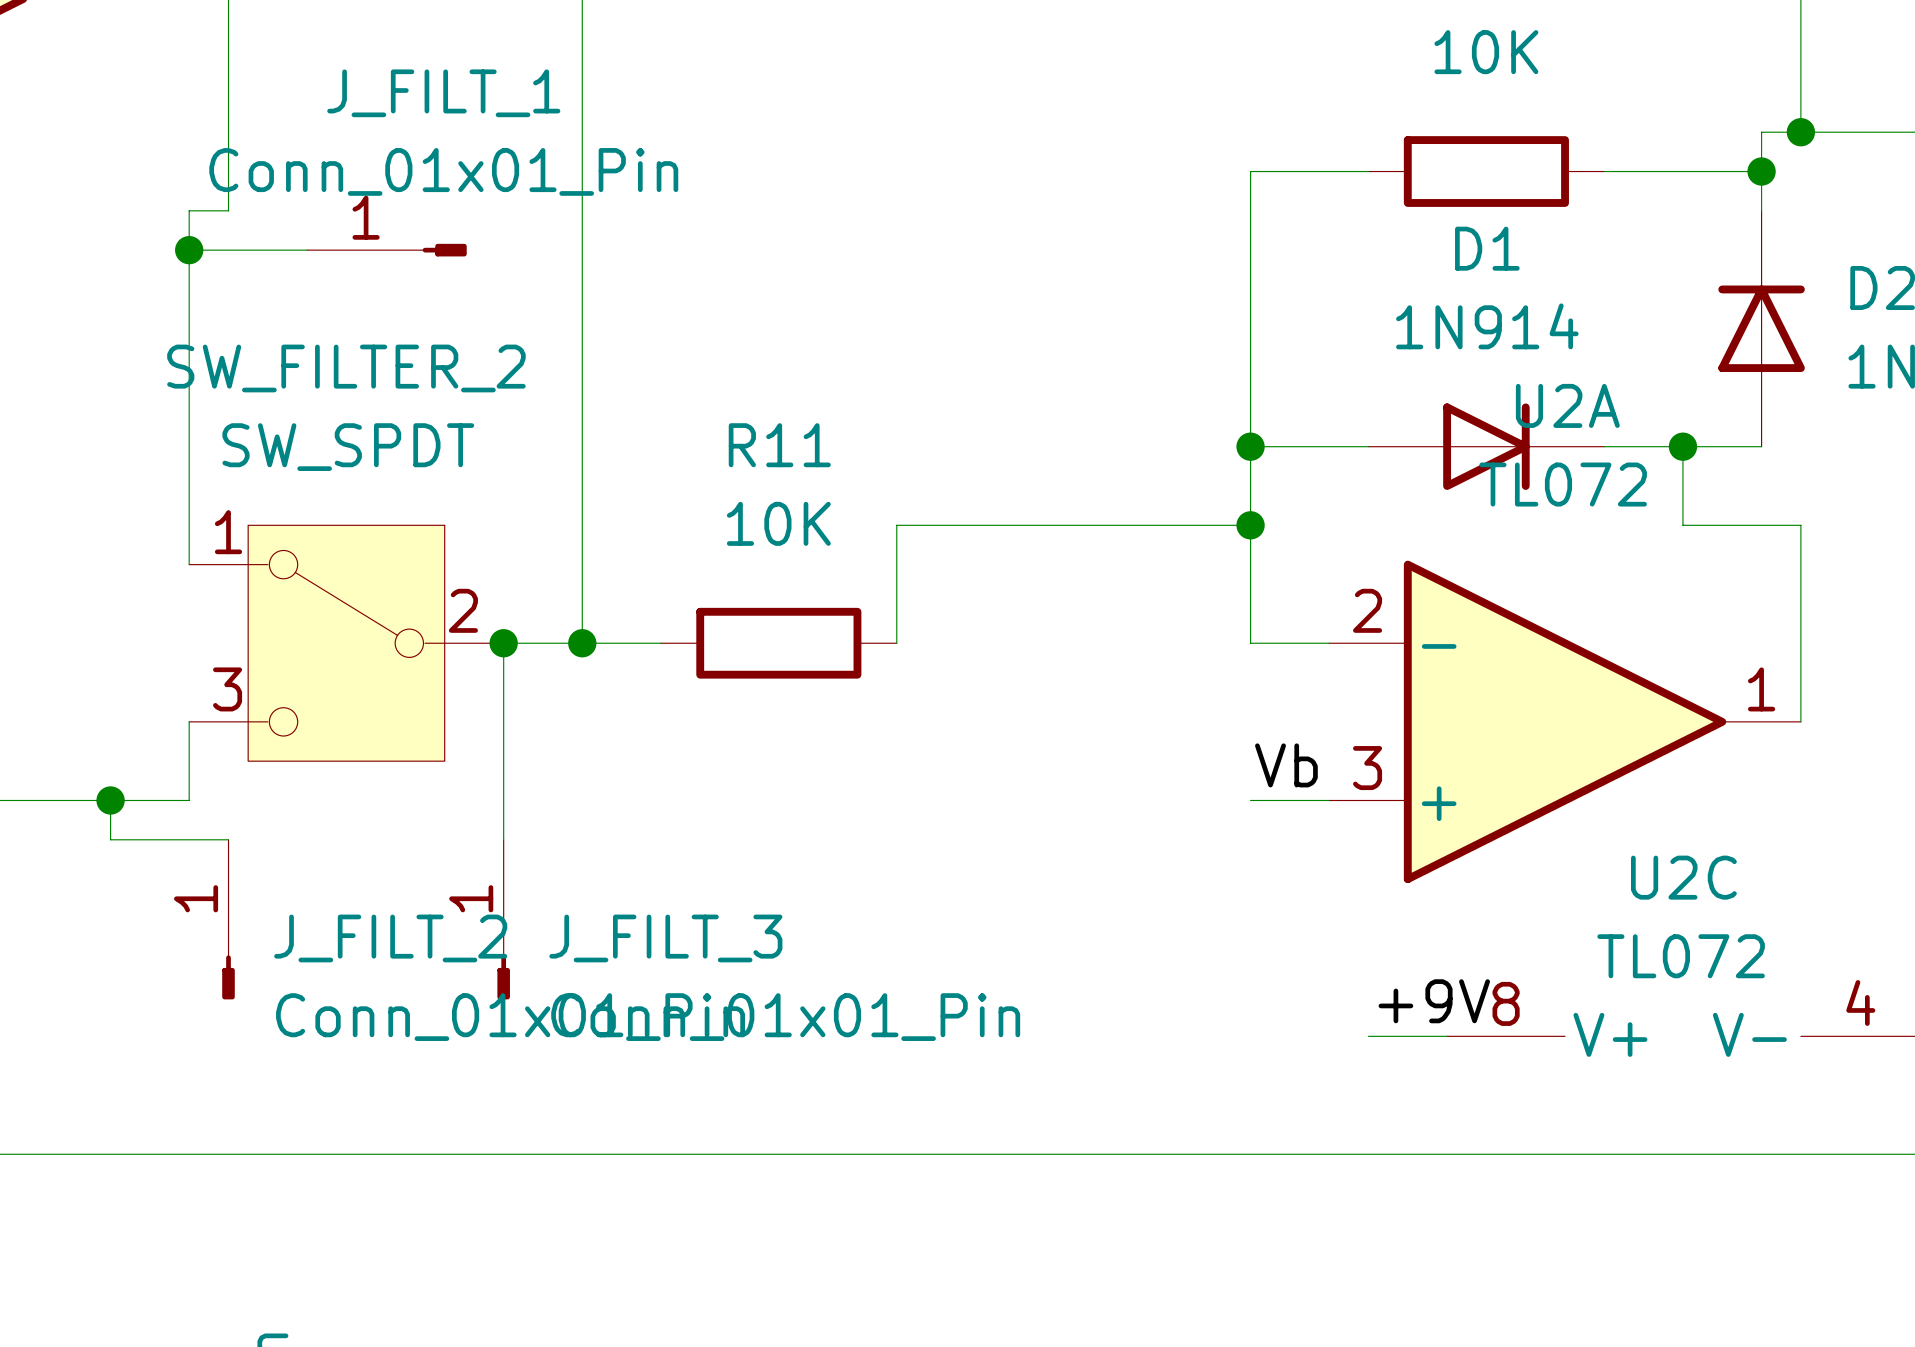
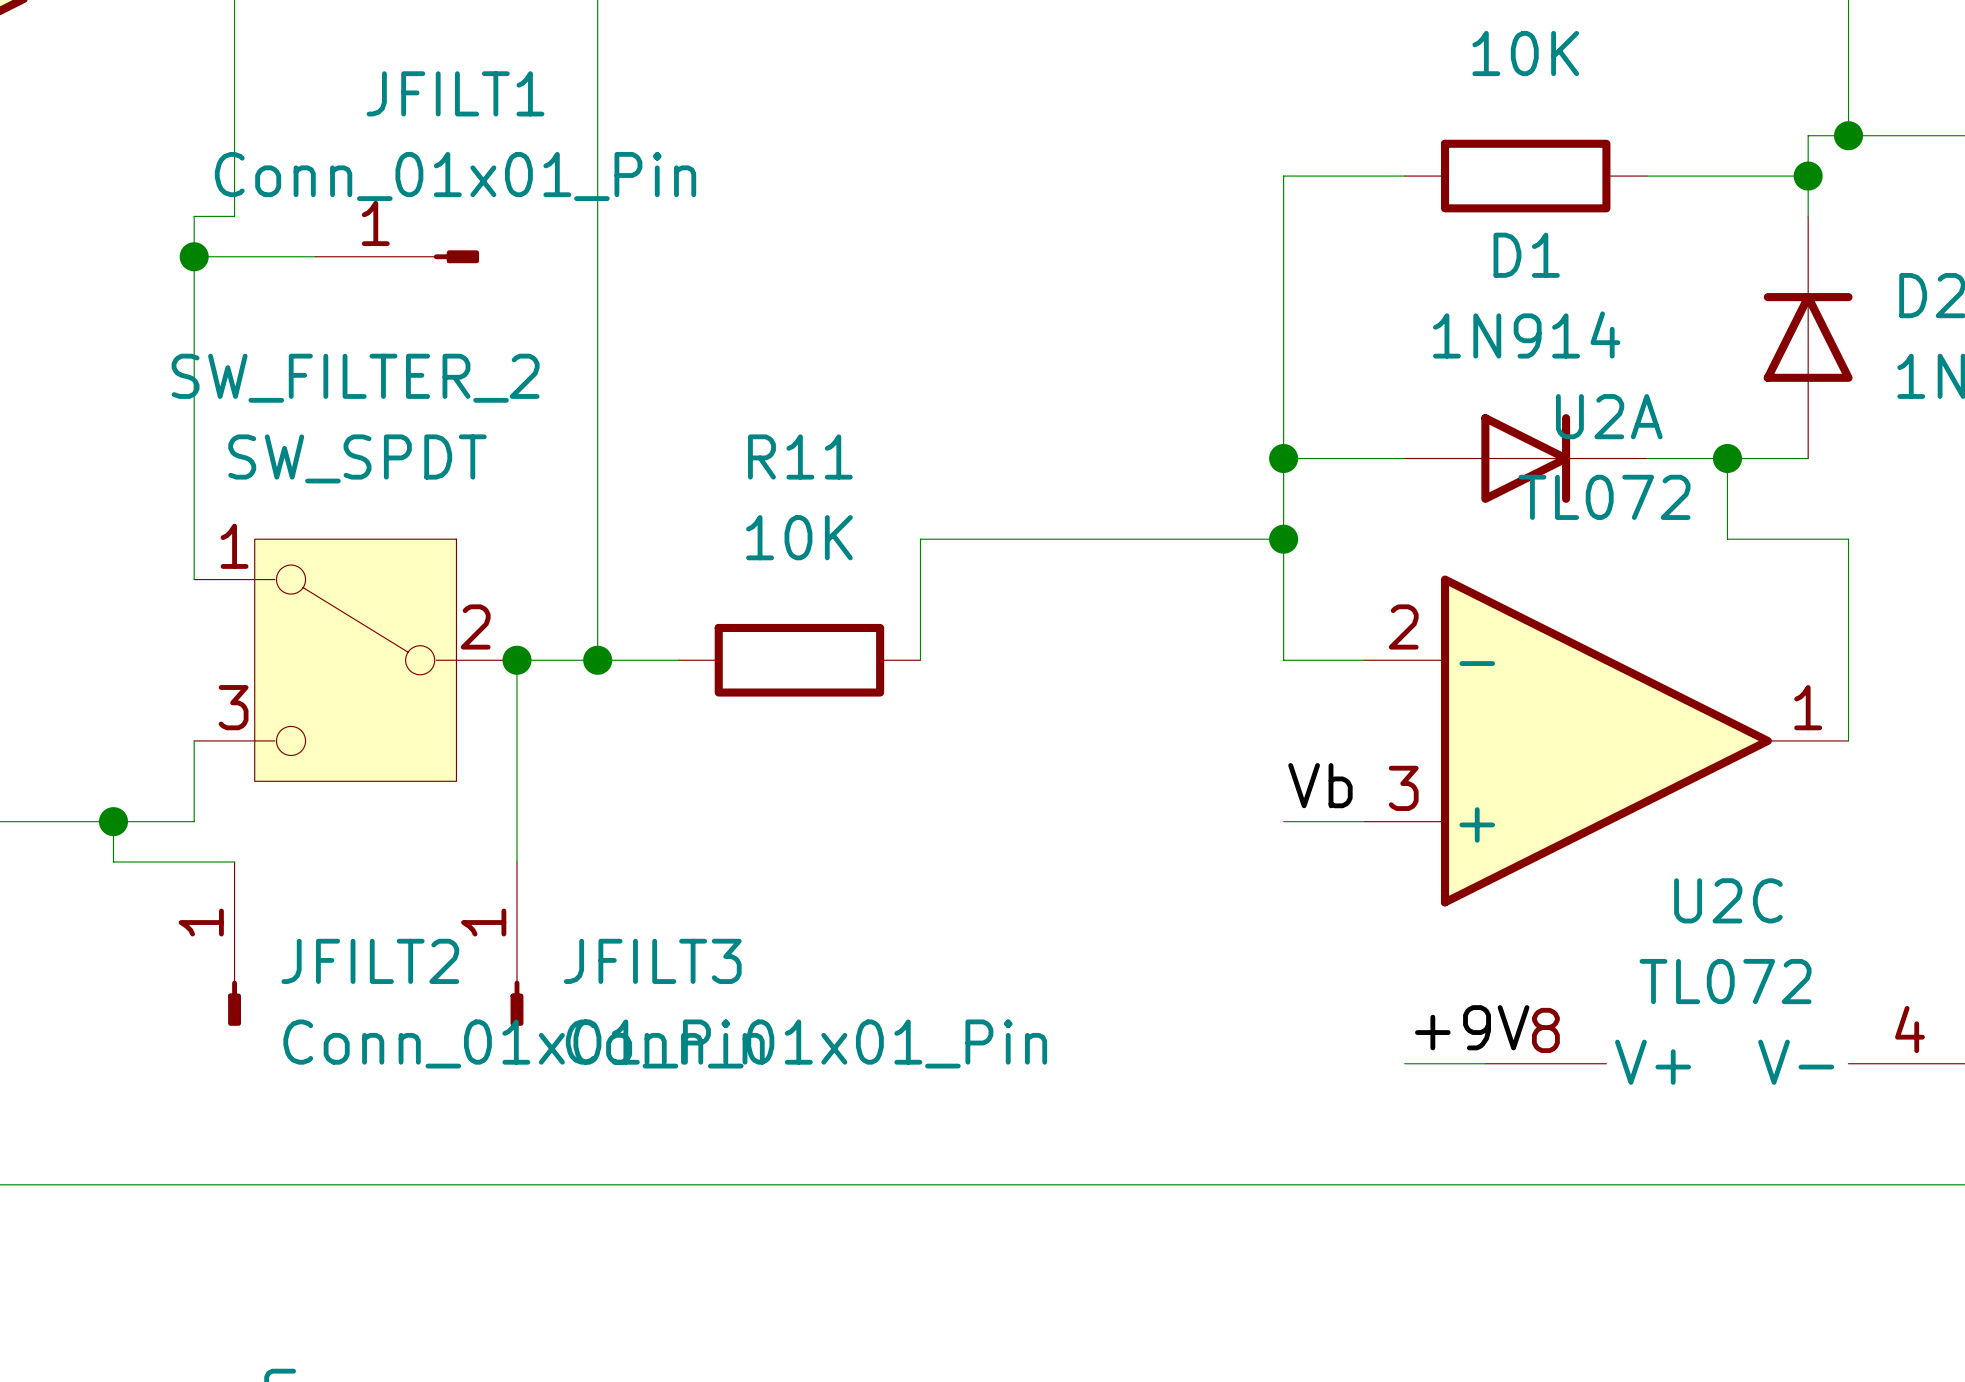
J_FILT_1 name: J_FILT_1 (443, 93) -> JFILT1 (455, 93)
J_FILT_2 name: J_FILT_2 (390, 938) -> JFILT2 (370, 961)
J_FILT_3 name: J_FILT_3 (665, 938) -> JFILT3 (652, 961)

